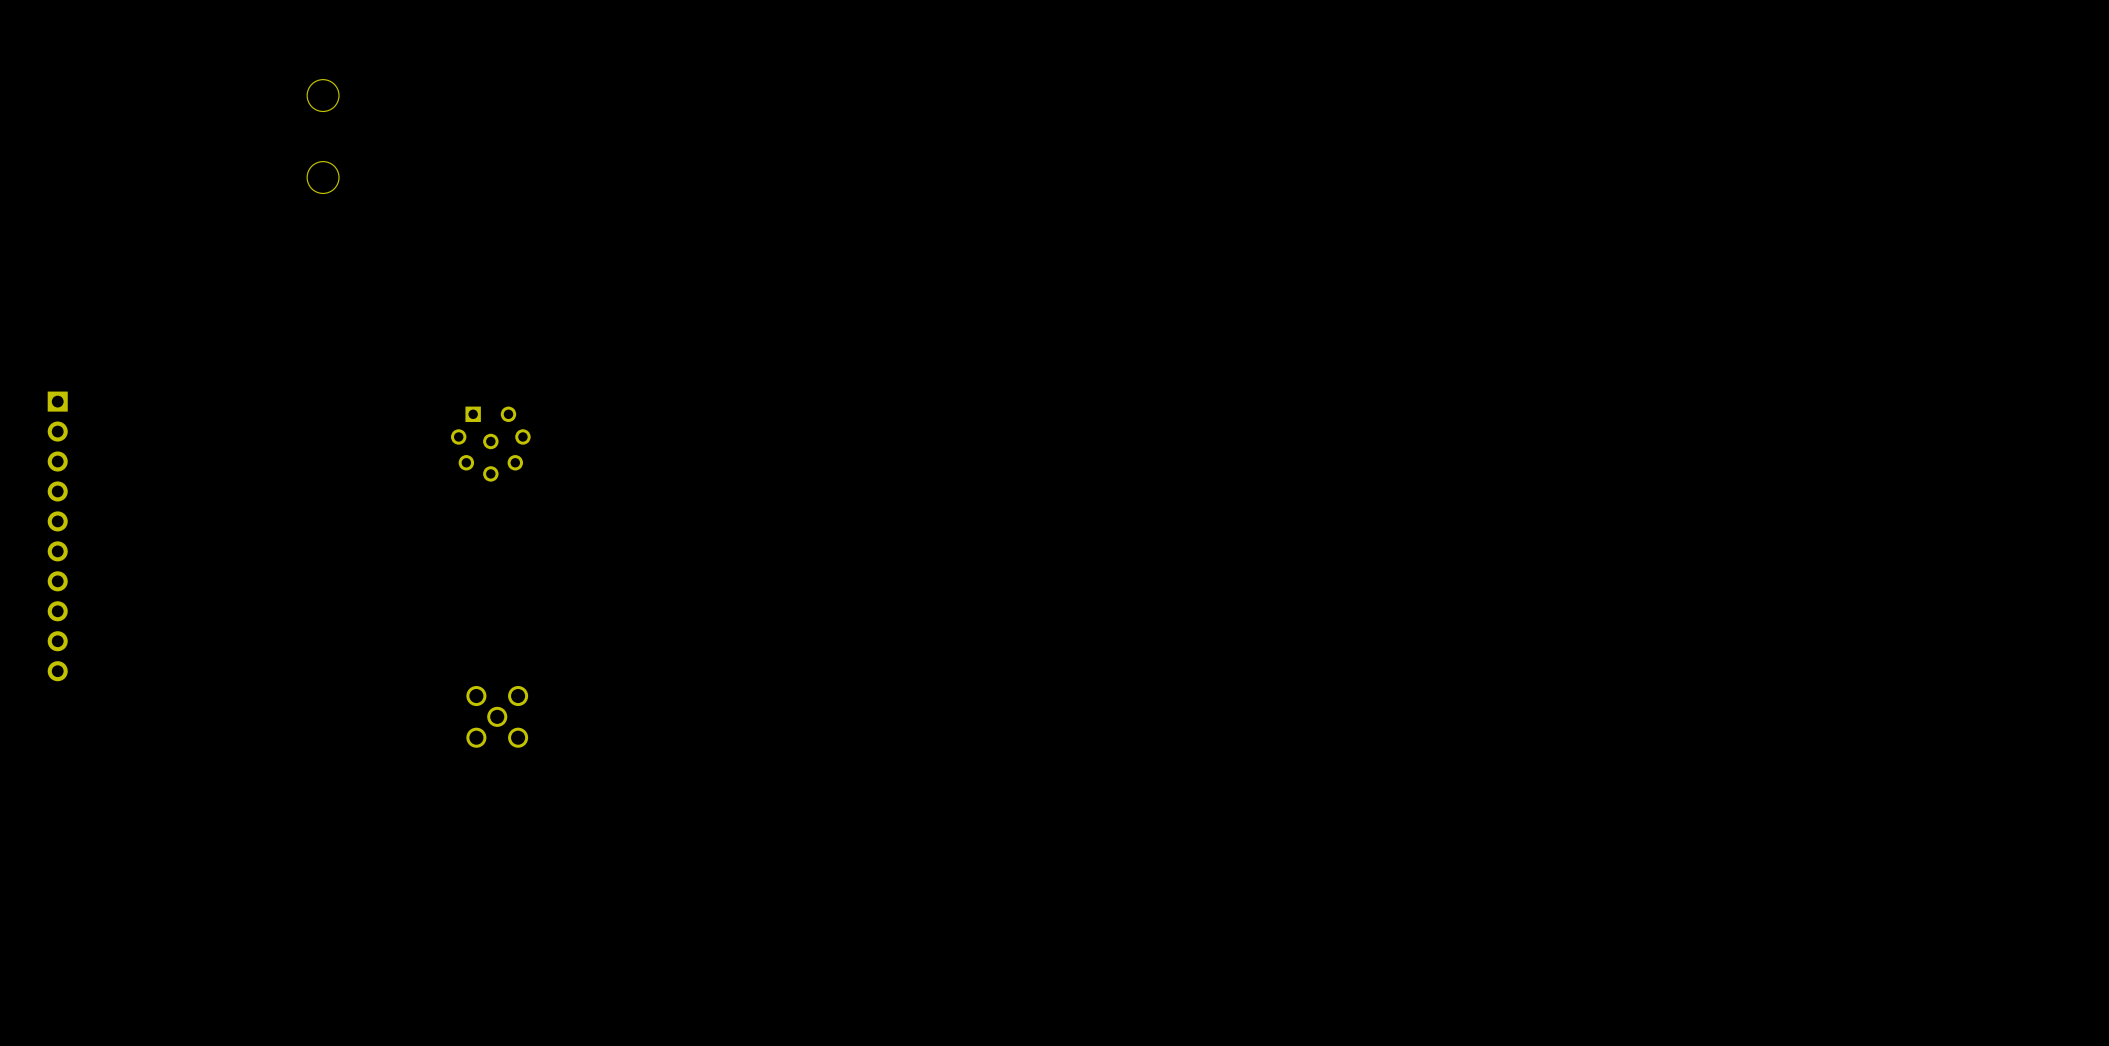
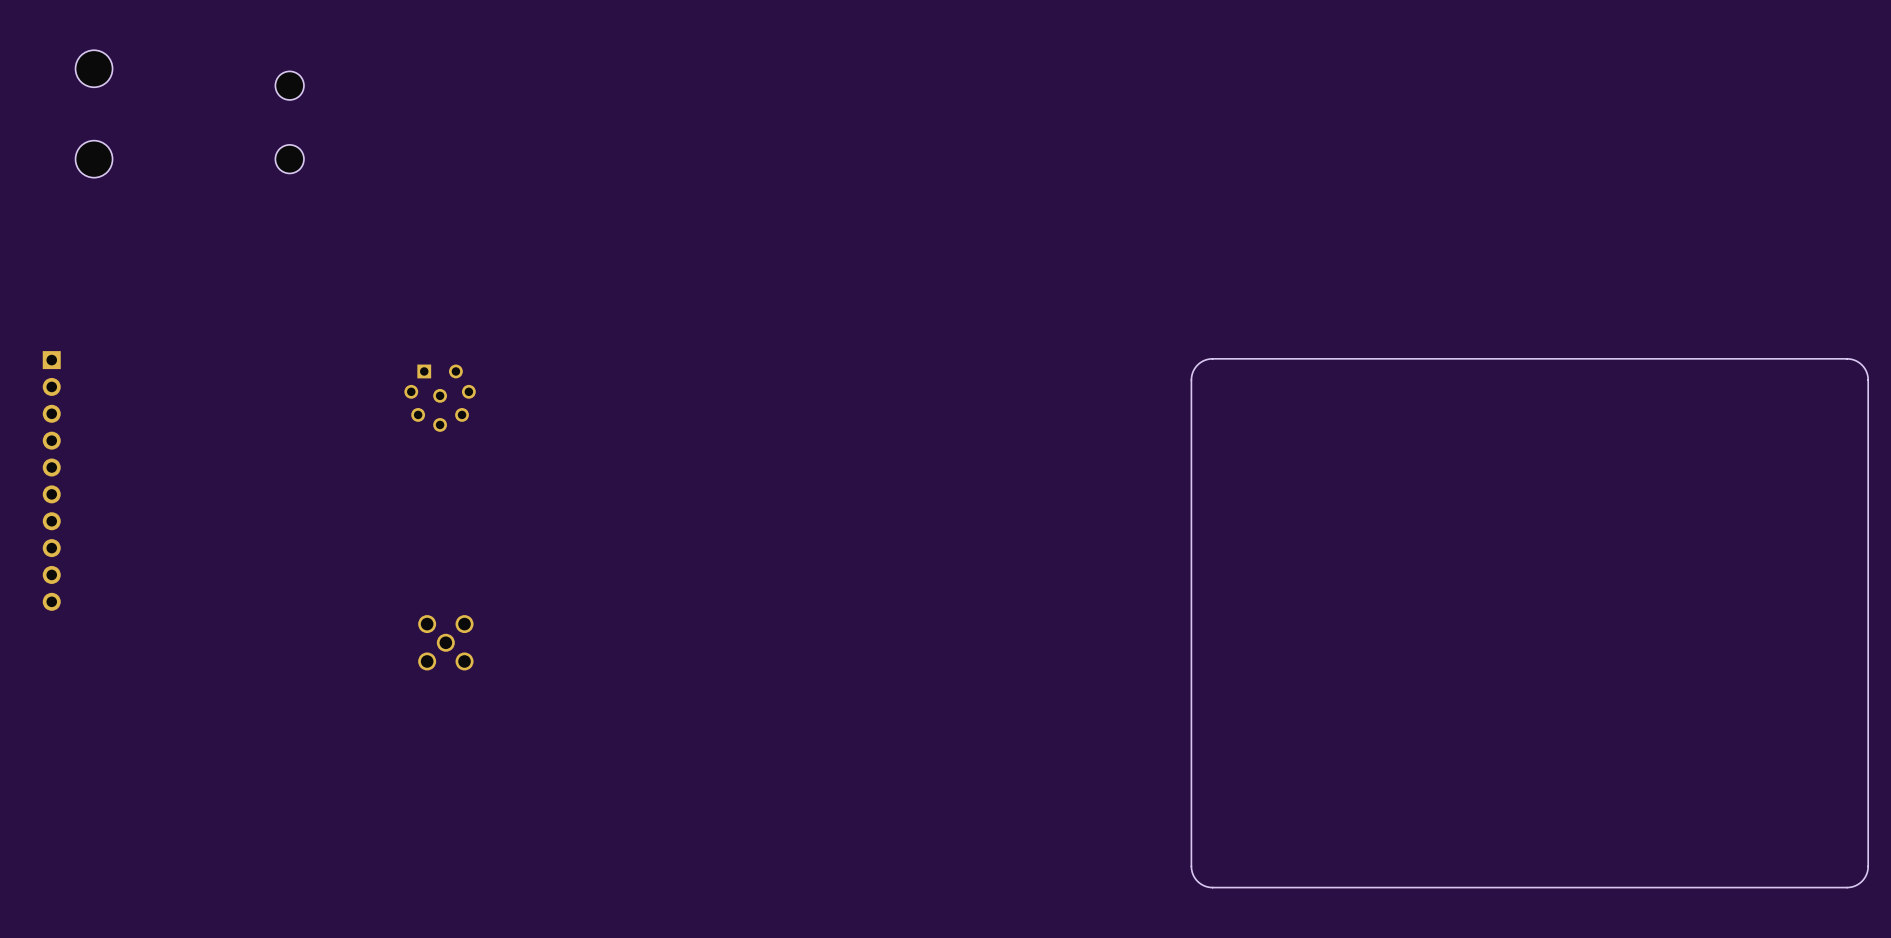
part: none -> (94, 68)
part: none -> (94, 159)
board edge: none -> (1847, 358) (1212, 358) (1199, 363) (1193, 370) (1191, 379) (1191, 866) (1196, 879) (1203, 885) (1212, 887) (1847, 887) (1860, 882) (1866, 875) (1868, 866) (1868, 379) (1866, 373) (1861, 365) (1854, 360) (1847, 358)

